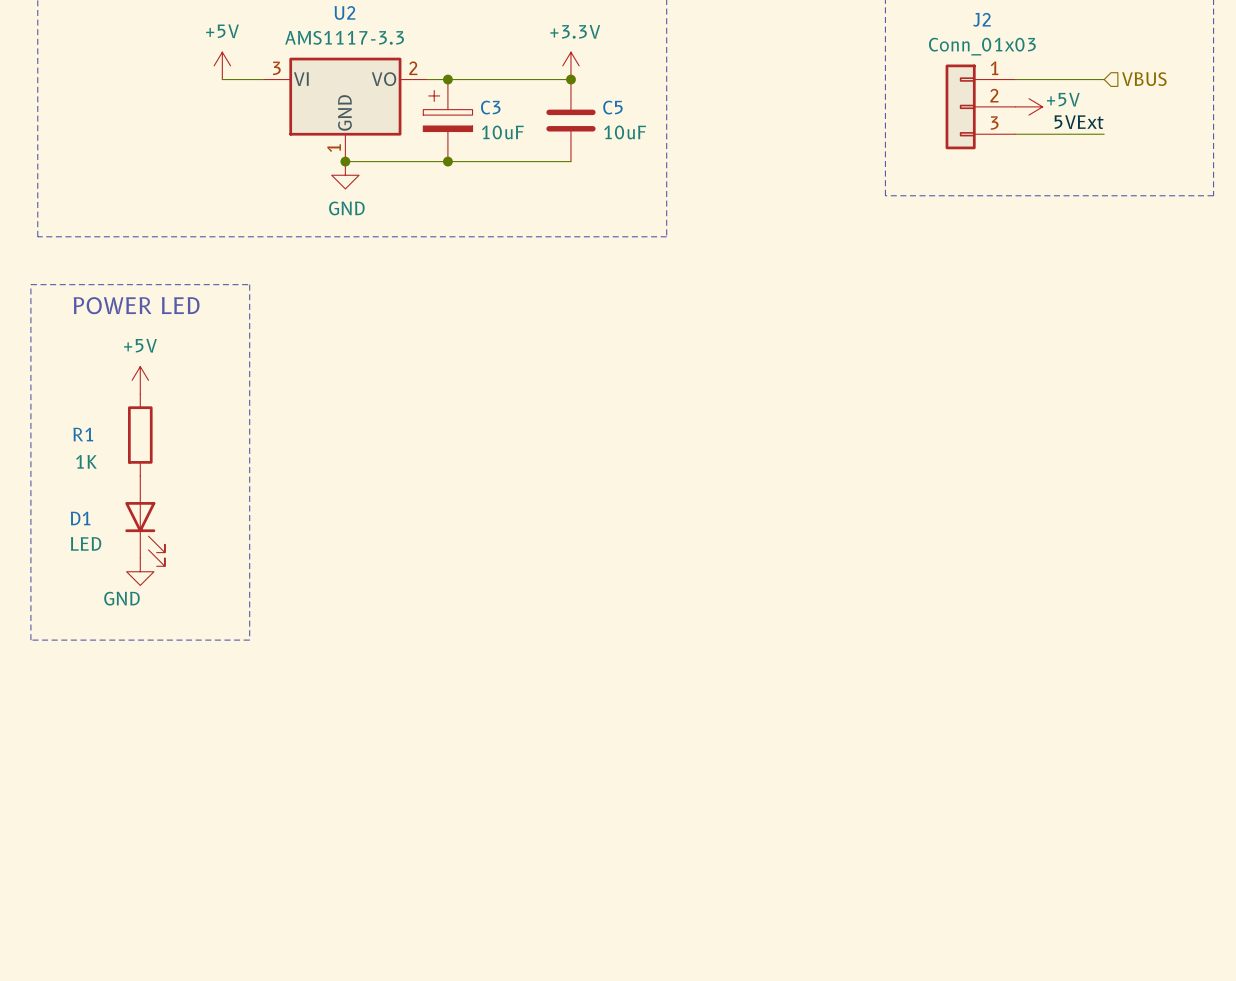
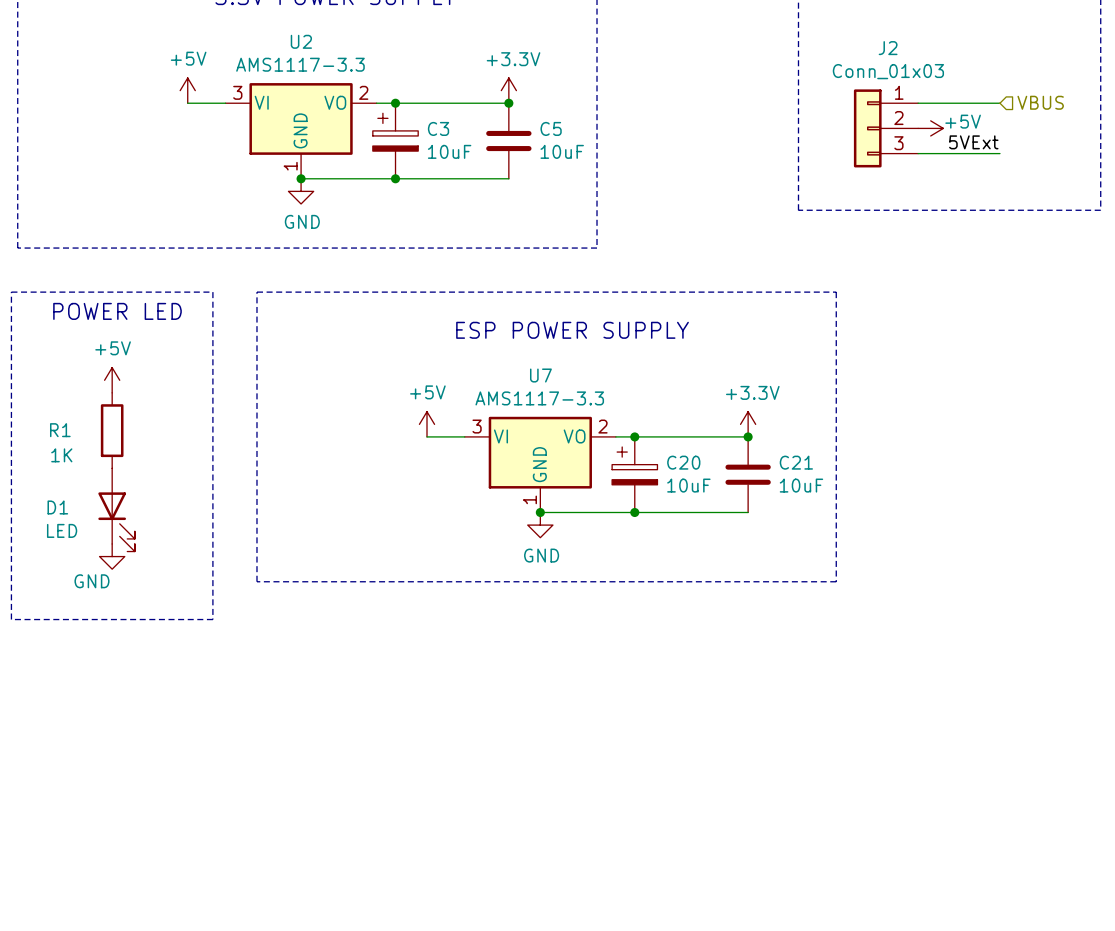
line: none -> (256, 292) (836, 292) (836, 581) (256, 581) (256, 292)
text: none -> ESP POWER SUPPLY (572, 330)
power symbol: none -> +5V (427, 424)
power symbol: none -> +3.3V (748, 424)
wire: none -> (427, 436) (464, 436)
wire: none -> (615, 436) (748, 436)
junction: none -> (634, 436)
junction: none -> (748, 436)
U7: none -> AMS1117-3.3 (540, 464)
C20: none -> 10uF (634, 474)
C21: none -> 10uF (748, 474)
wire: none -> (540, 512) (748, 512)
junction: none -> (540, 512)
junction: none -> (634, 512)
power symbol: none -> GND (540, 525)

